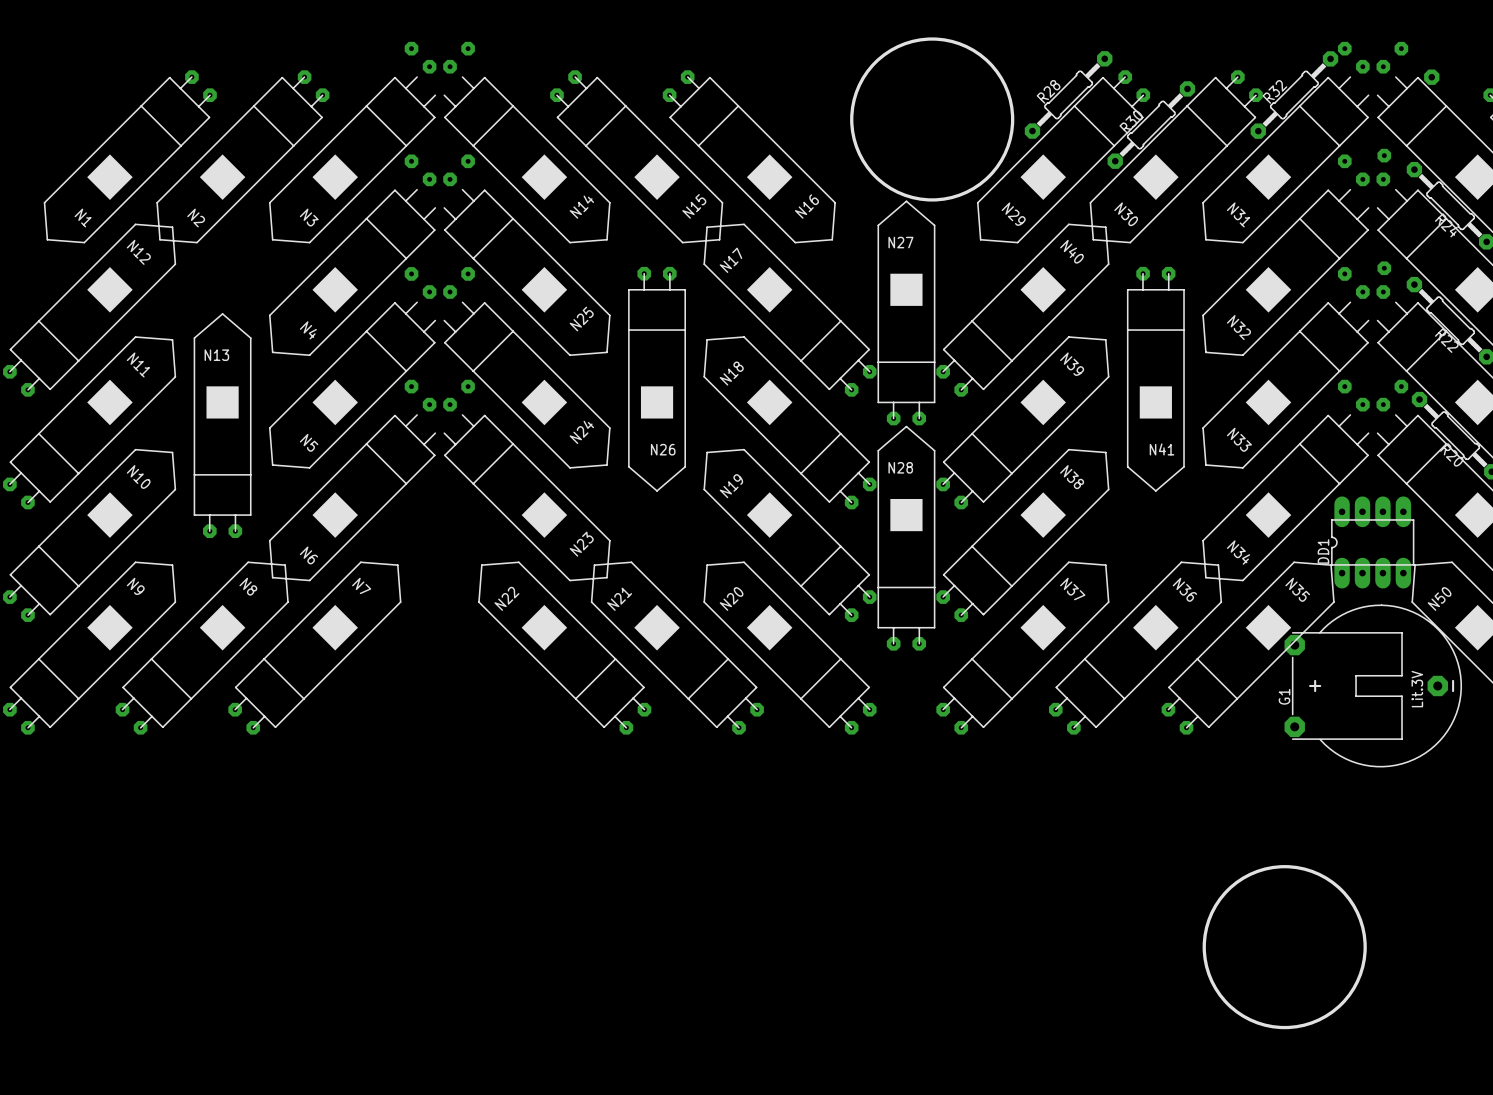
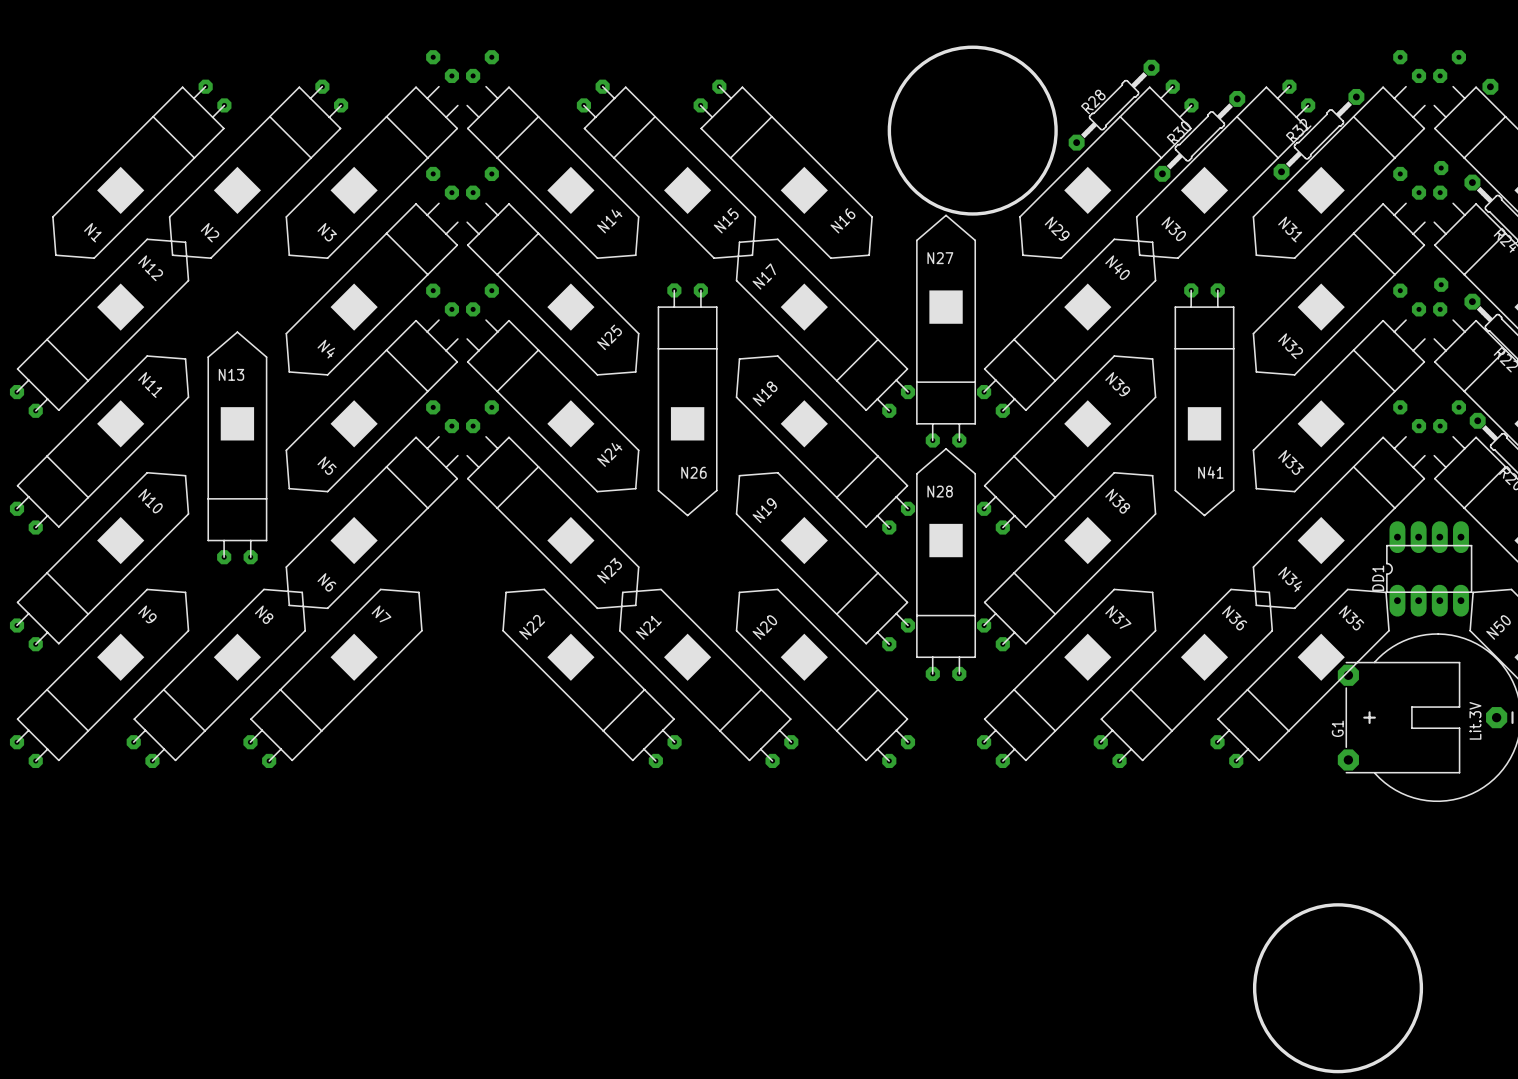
R32 position: (1294, 95) -> (1318, 134)

